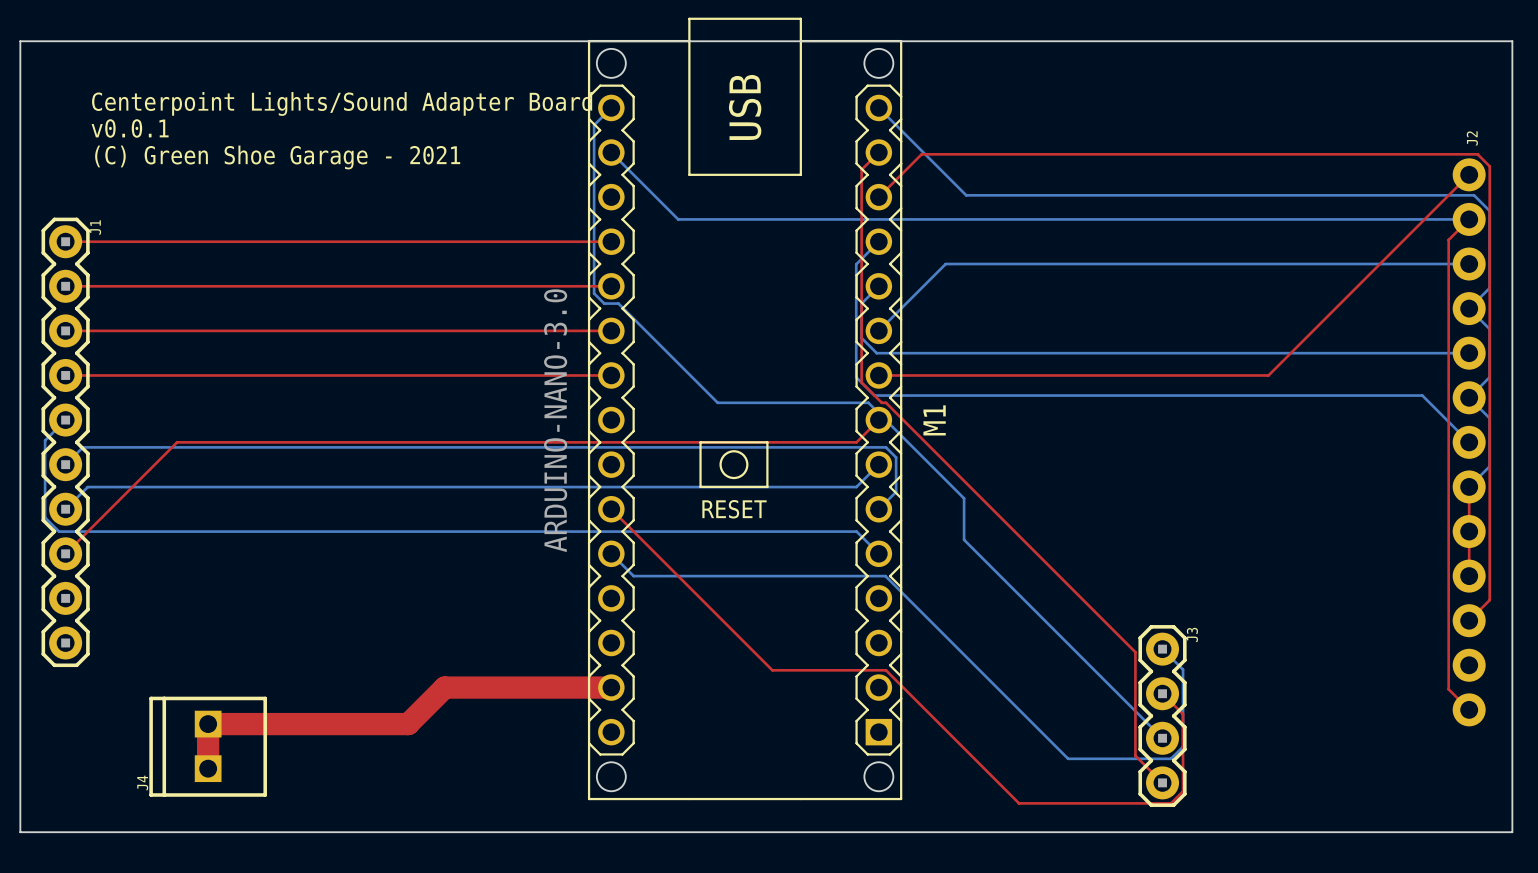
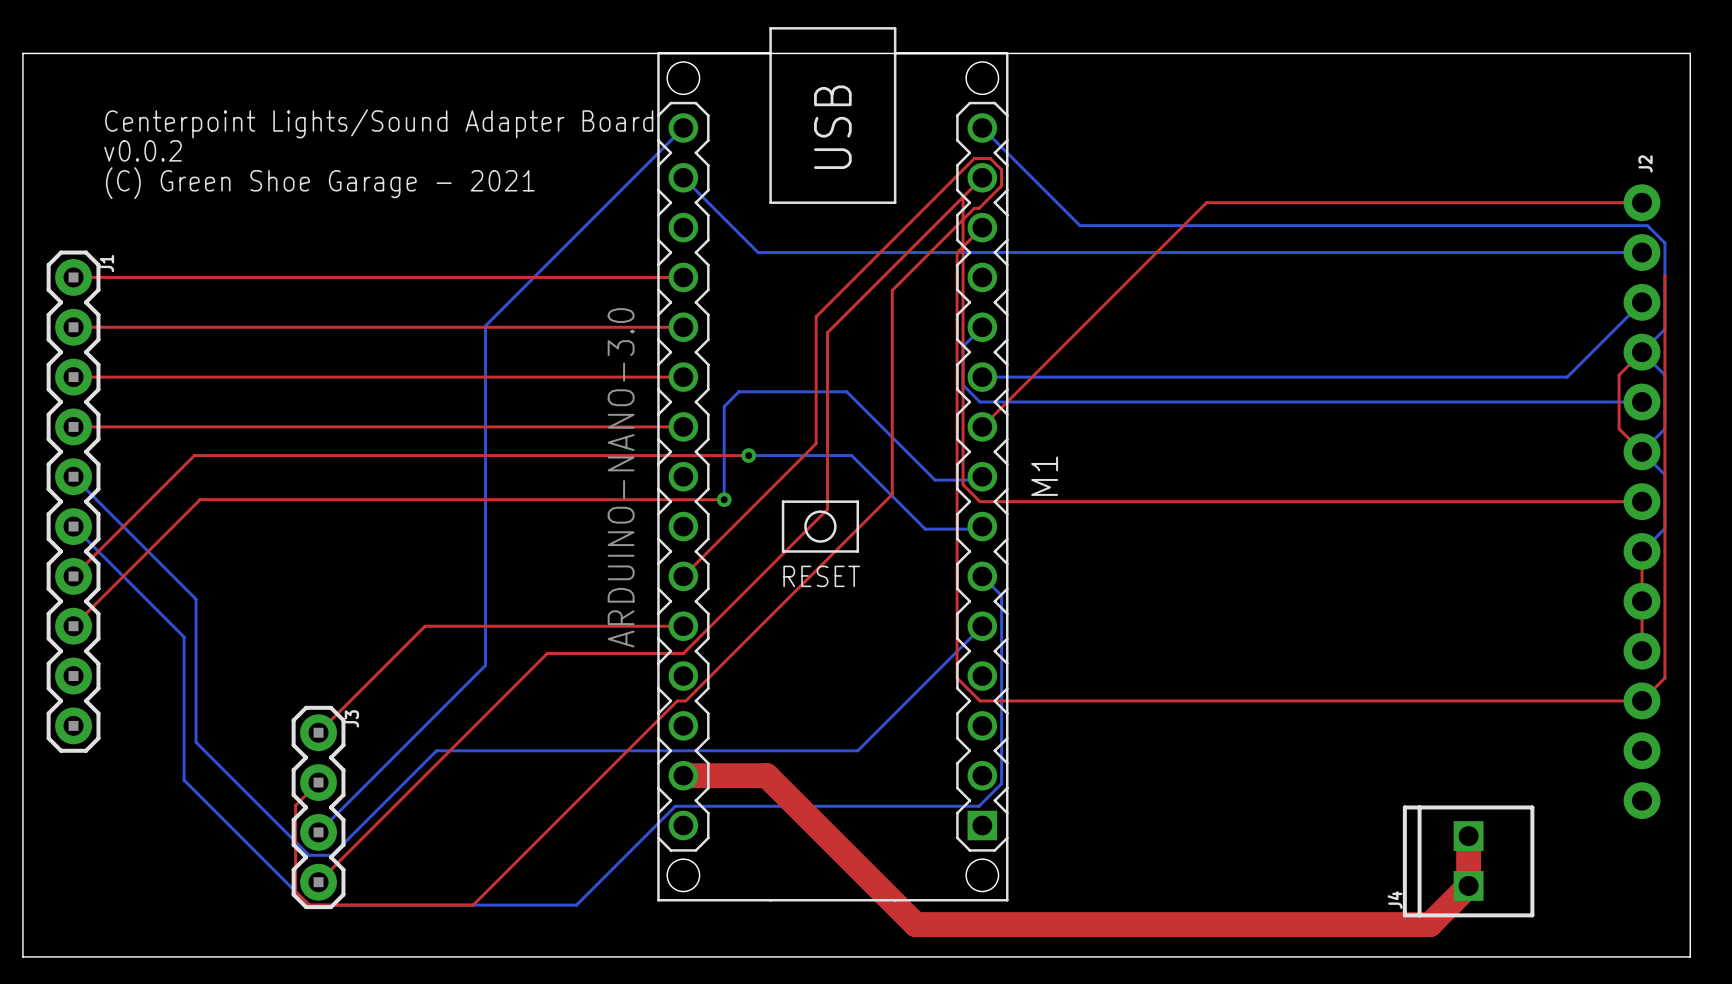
bottom track: (594, 125) (594, 293) (604, 303) (618, 303) (717, 402) (868, 402) (964, 498) (964, 539) (1162, 738) -> (664, 147) (485, 325) (485, 665) (318, 832)
text: v0.0.1 (130, 128) -> v0.0.2 (143, 150)
top track: none -> (963, 197) (827, 332) (827, 509) (683, 653) (547, 653) (318, 882)
top track: (1469, 174) (1268, 375) (878, 375) -> (1642, 202) (1206, 202) (982, 426)
top track: (878, 197) (921, 154) (1477, 154) (1489, 166) (1489, 239) -> (982, 227) (957, 252) (957, 678) (979, 700) (1642, 700)
top track: (1469, 219) (1448, 239) (1448, 329) -> (1642, 352) (1619, 375)
bottom track: (878, 241) (856, 264) (856, 377) (874, 395) (1422, 395) (1469, 442) -> none
bottom track: (1469, 264) (945, 264) (878, 330) -> (1642, 302) (1567, 377) (982, 377)
top track: (1448, 377) (1448, 689) (1469, 709) -> (1619, 428) (1642, 451)
top track: (861, 382) (881, 402) (886, 402) (1135, 652) (1135, 755) (1162, 782) -> (963, 434) (963, 484) (979, 501) (1642, 501)
top track: none -> (748, 455) (194, 455) (73, 576)
via: none -> (748, 455)
bottom track: (65, 420) (45, 440) (45, 517) (58, 531) (856, 531) (878, 553) -> (73, 476) (196, 599) (196, 742) (309, 855) (332, 855) (436, 750) (857, 750) (982, 626)
bottom track: none -> (982, 476) (979, 480) (935, 480) (846, 391) (738, 391) (724, 406) (724, 499)
top track: (878, 420) (856, 442) (177, 442) -> (729, 499) (200, 499) (198, 501)
via: none -> (724, 499)
bottom track: (65, 464) (82, 447) (886, 447) (896, 457) (896, 491) (878, 509) -> (73, 526) (184, 637) (184, 780) (309, 905) (576, 905) (675, 806) (979, 806) (1001, 783) (1001, 595) (982, 576)
bottom track: (876, 466) (856, 487) (87, 487) (65, 509) -> (979, 529) (925, 529) (851, 455) (748, 455)
top track: (611, 509) (772, 670) (886, 670) (1019, 803) (1171, 803) (1183, 791) (1183, 714) (1162, 693) -> (683, 576) (816, 443) (816, 316) (974, 158) (990, 158) (1001, 169) (1001, 185) (979, 208) (974, 208) (892, 290) (892, 494) (685, 700) (677, 700) (473, 905) (309, 905) (295, 891) (295, 805) (318, 782)
bottom track: (611, 553) (633, 576) (885, 576) (1068, 758) (1171, 758) (1183, 746) (1183, 669) (1162, 649) -> none
top track: none -> (683, 626) (425, 626) (318, 732)
top track: (611, 687) (444, 687) (408, 724) (208, 724) (208, 768) -> (683, 775) (766, 775) (915, 924) (1429, 924) (1468, 885) (1468, 836)
J3 position: (1162, 716) -> (318, 807)
J4 position: (208, 746) -> (1468, 861)
board edge: (20, 832) (1512, 832) -> (22, 937) (22, 956) (1690, 956) (1690, 937)

